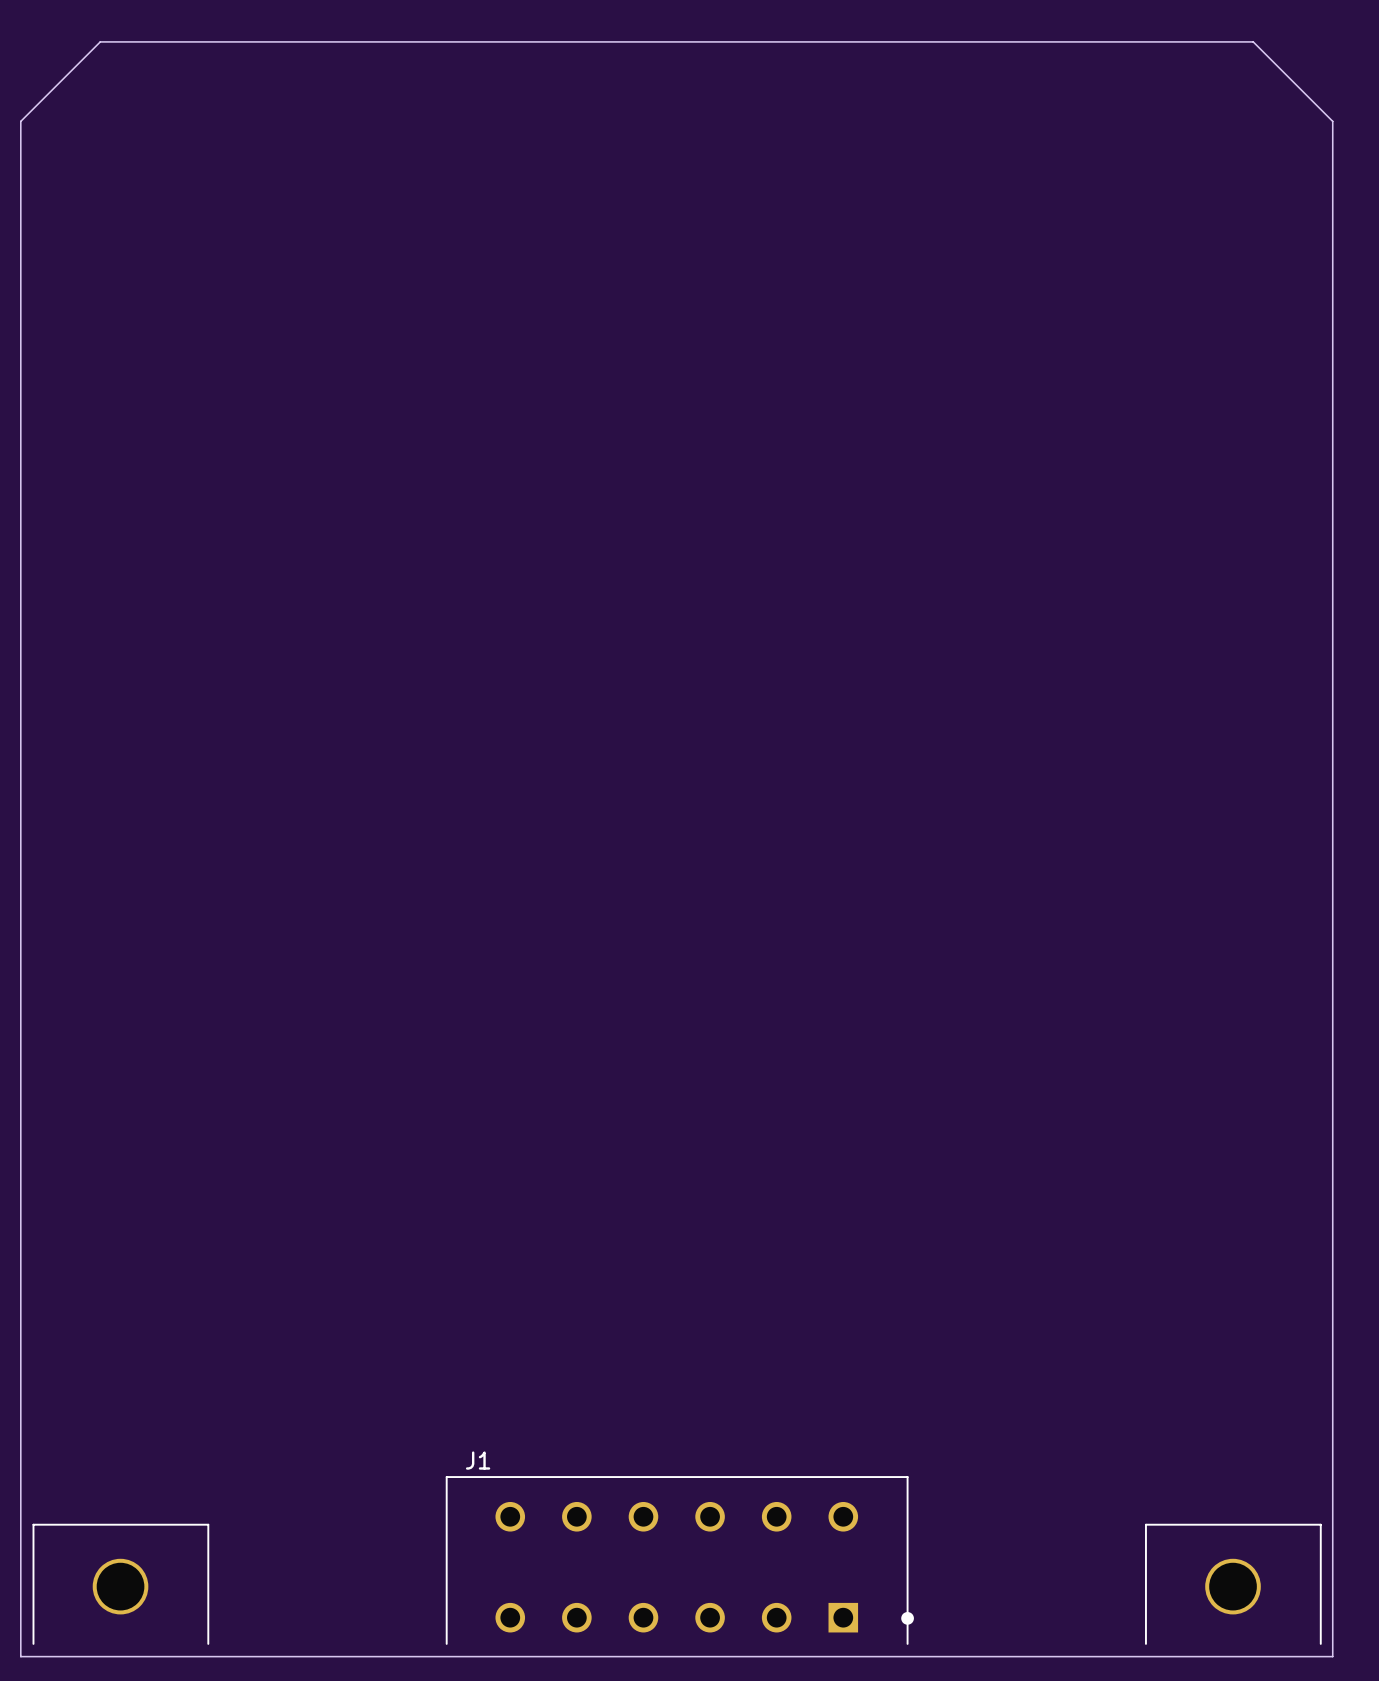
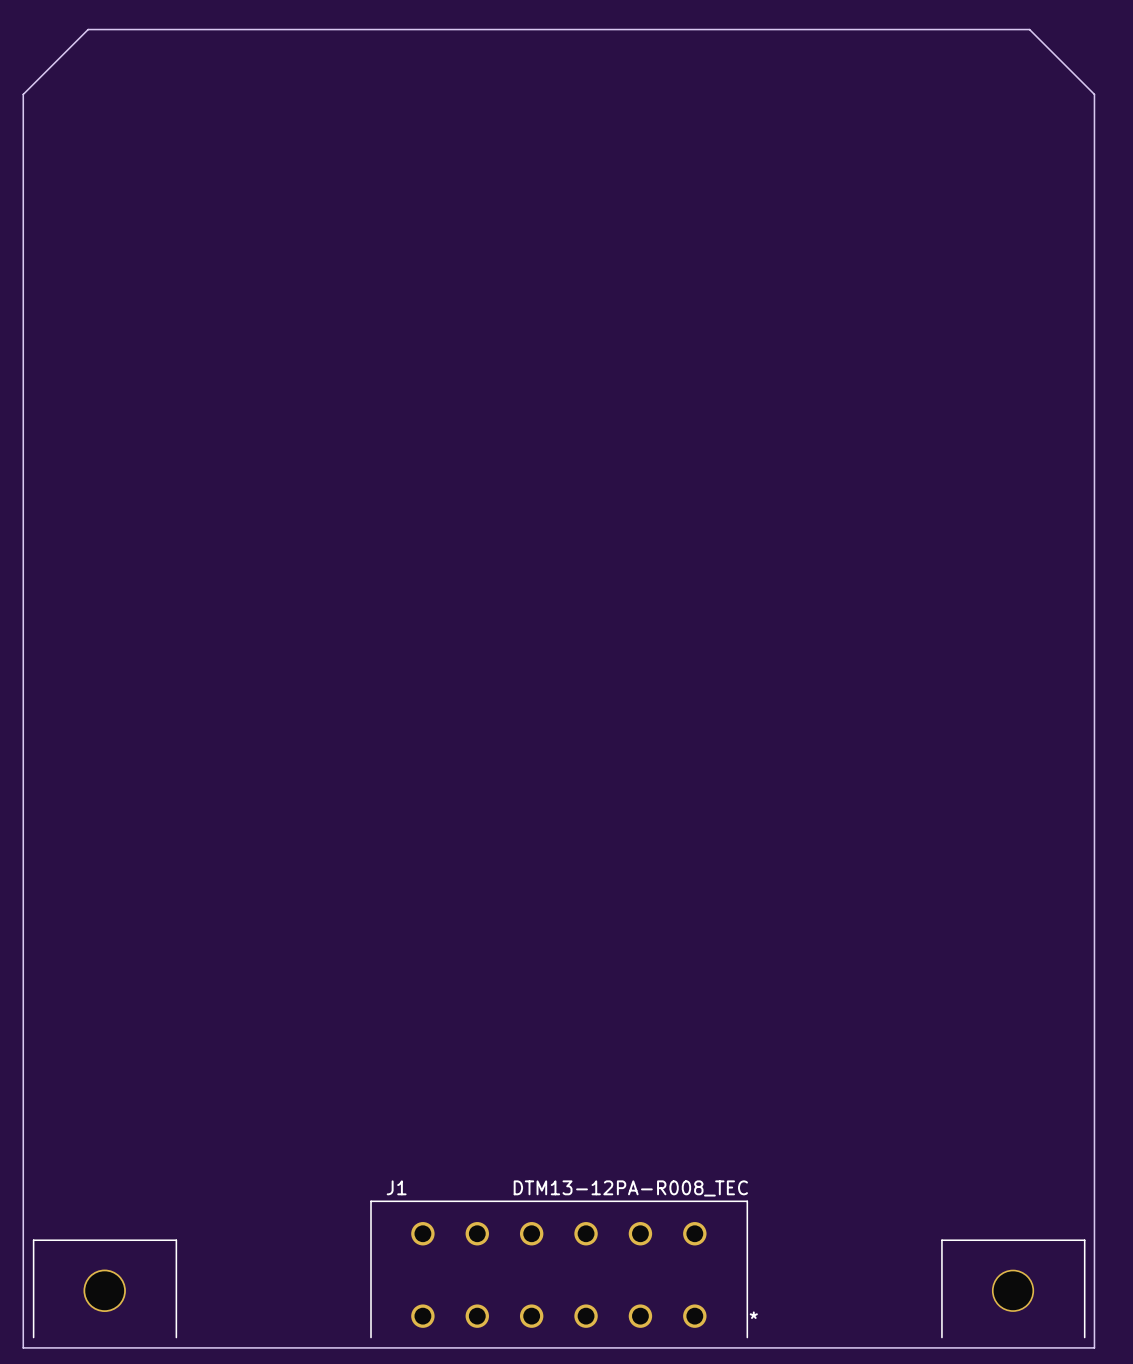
J1 value: none -> DTM13-12PA-R008_TEC (630, 1188)
J1 footprint: [32, 1476, 1322, 1645] -> [32, 1200, 1086, 1339]

